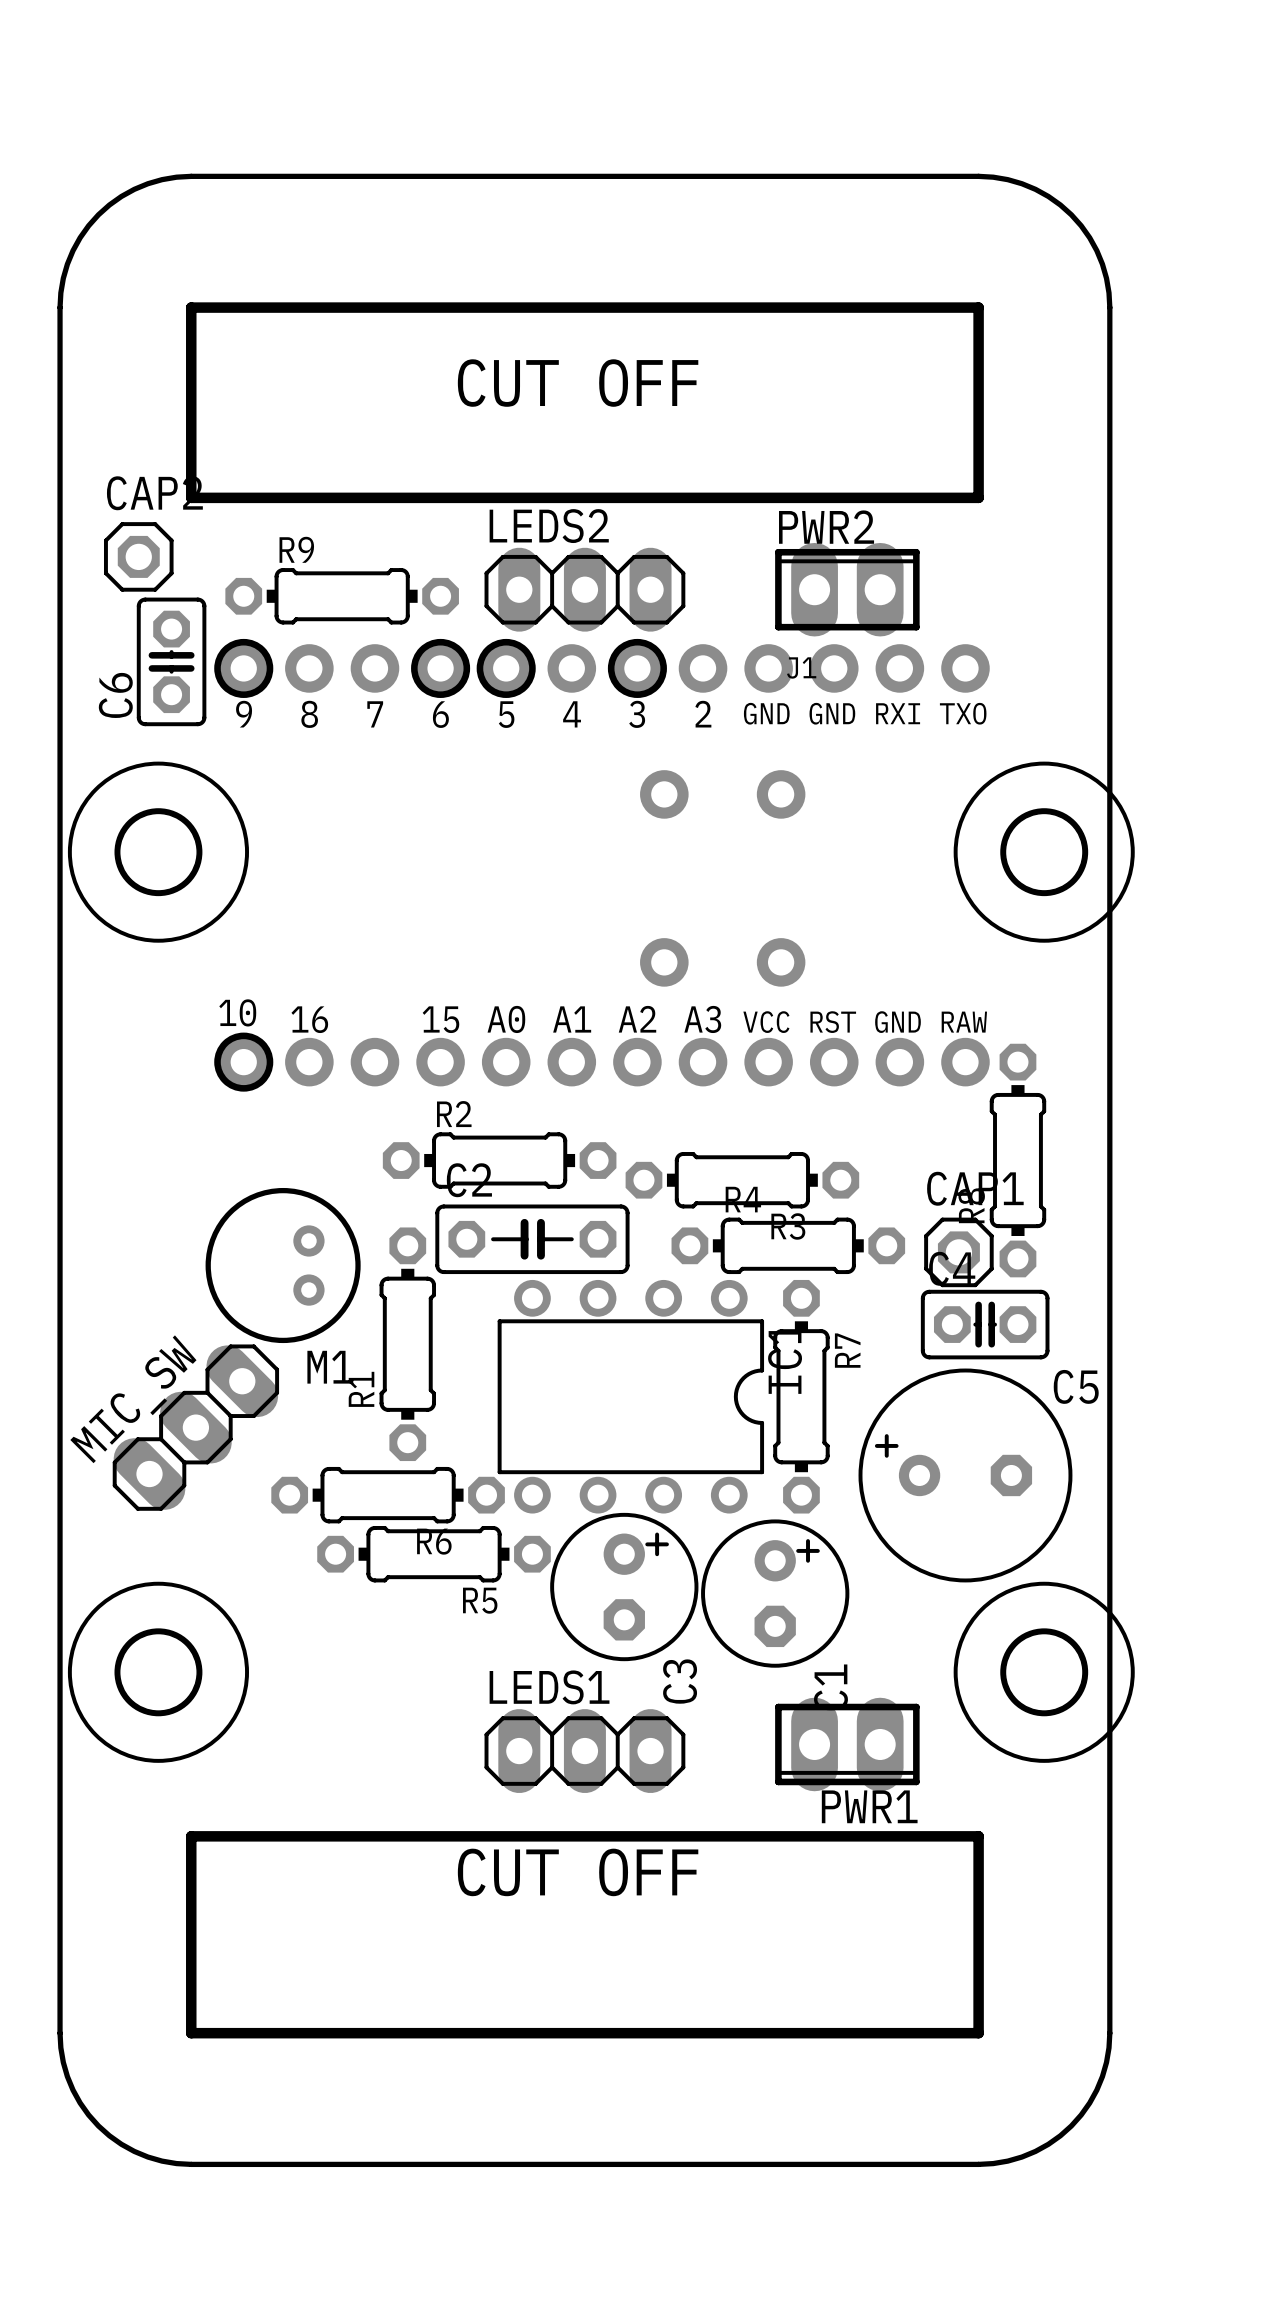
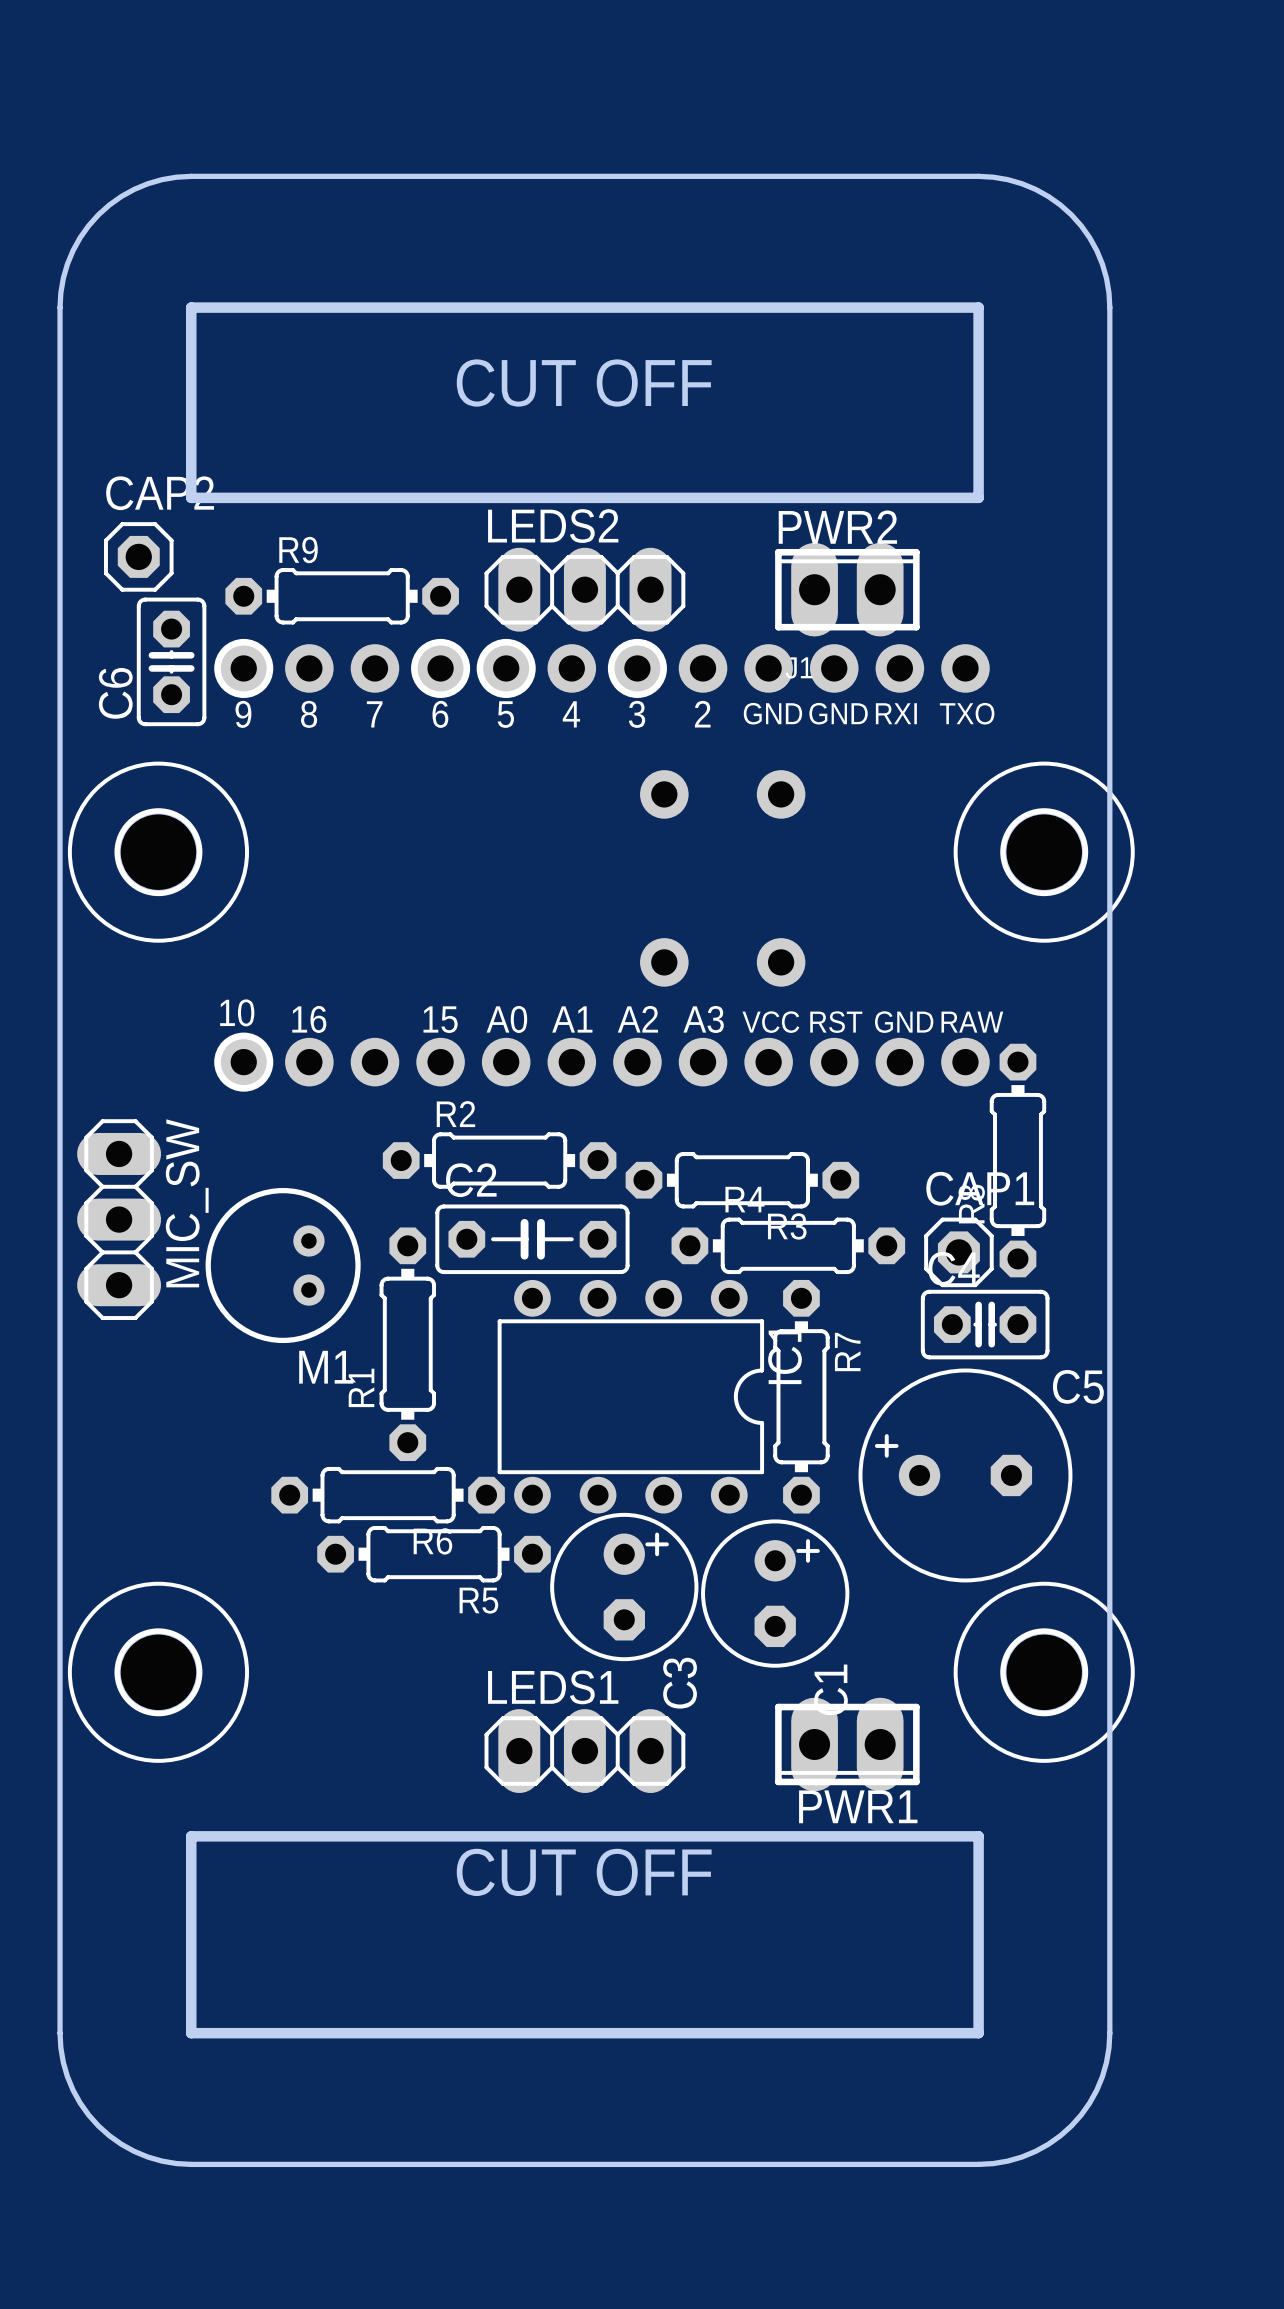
MIC_SW: none -> (119, 1219)
MIC_SW: (195, 1427) -> none

